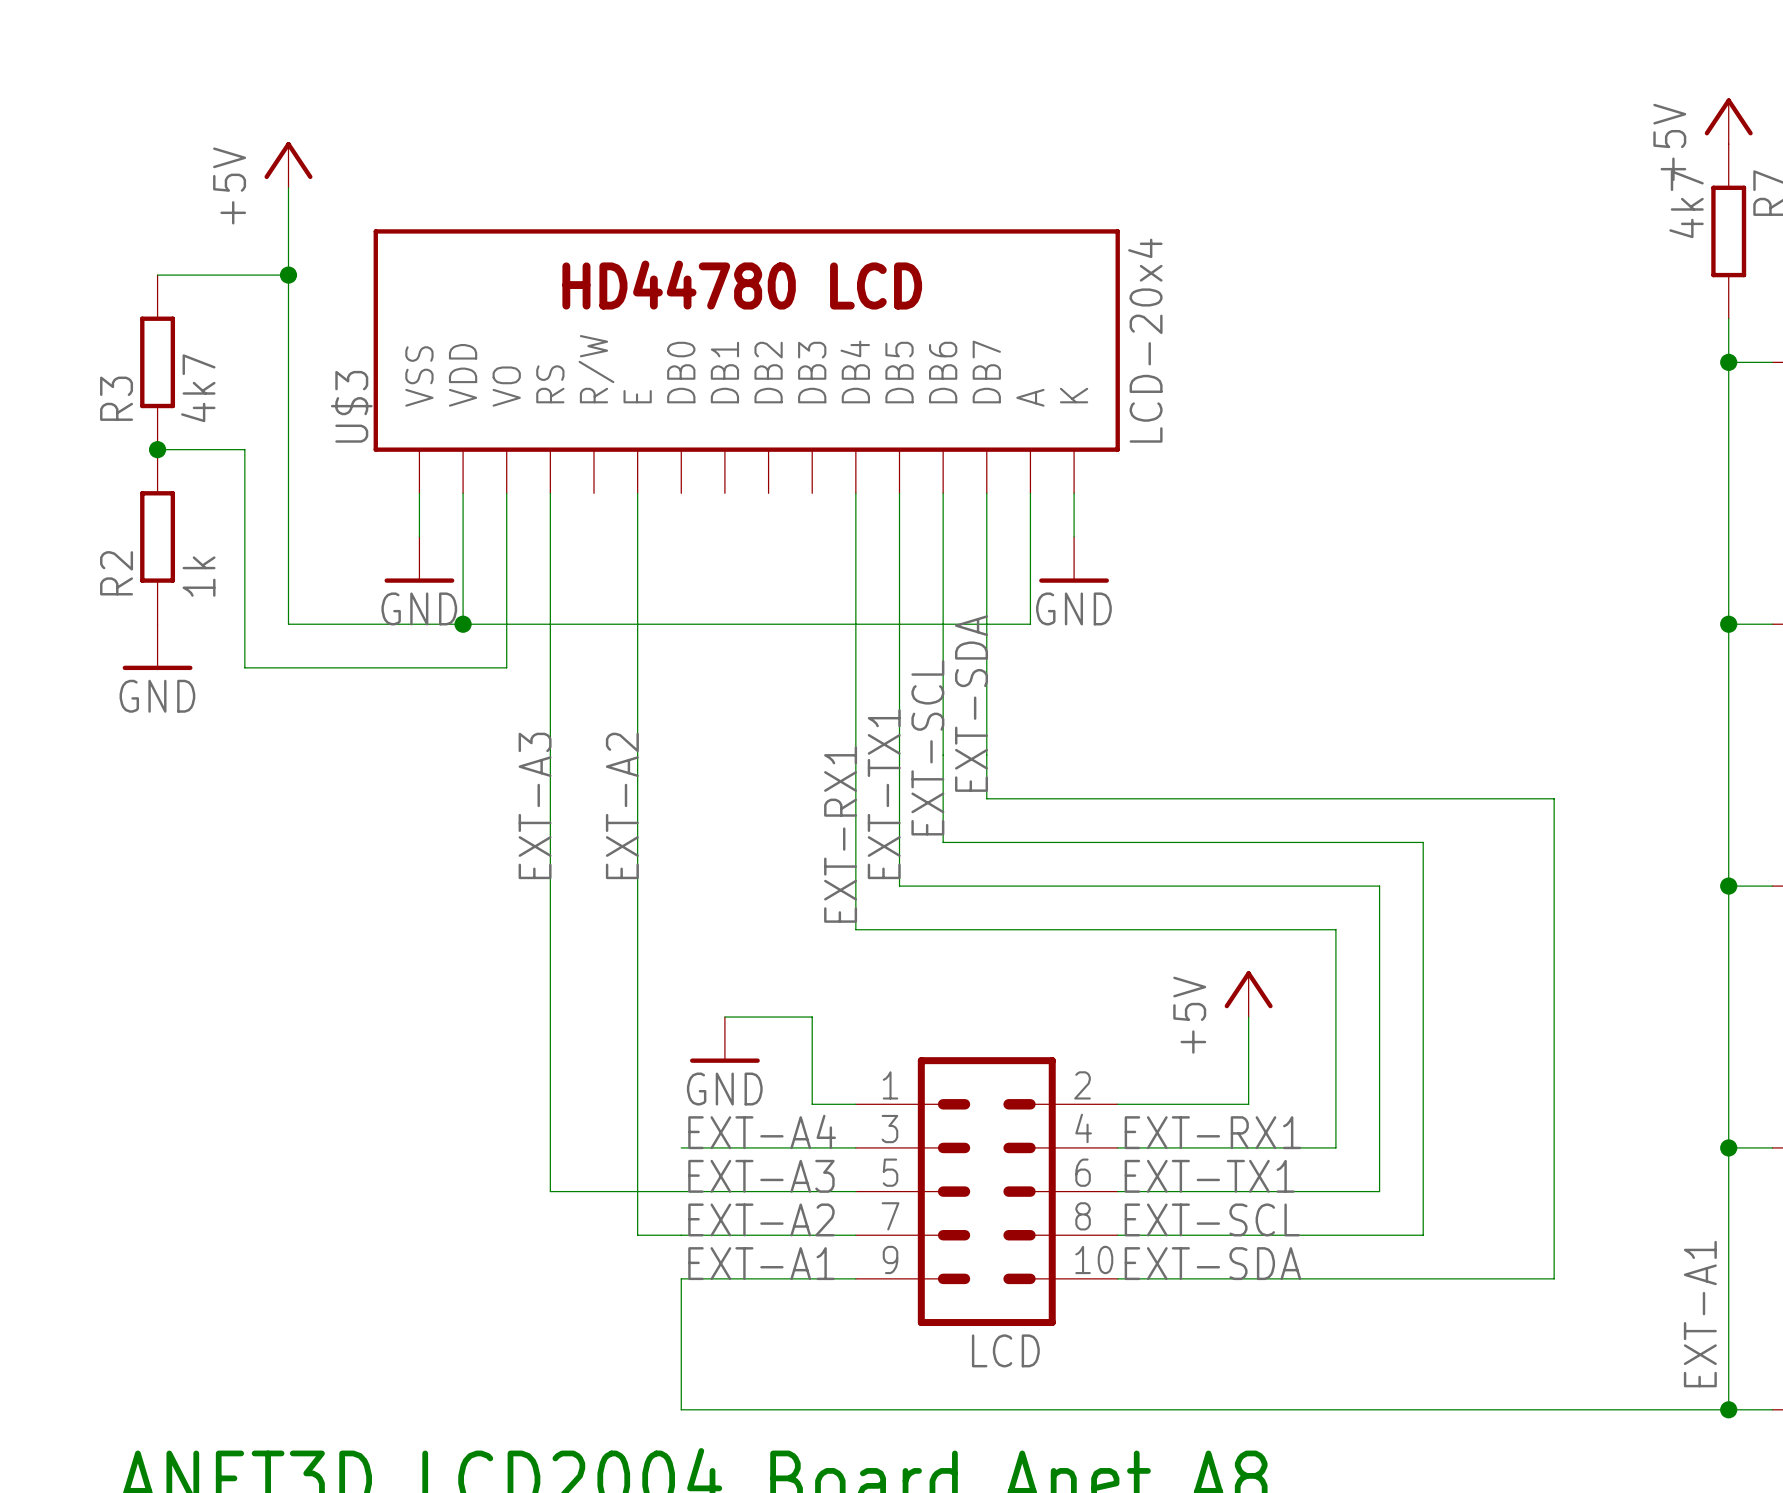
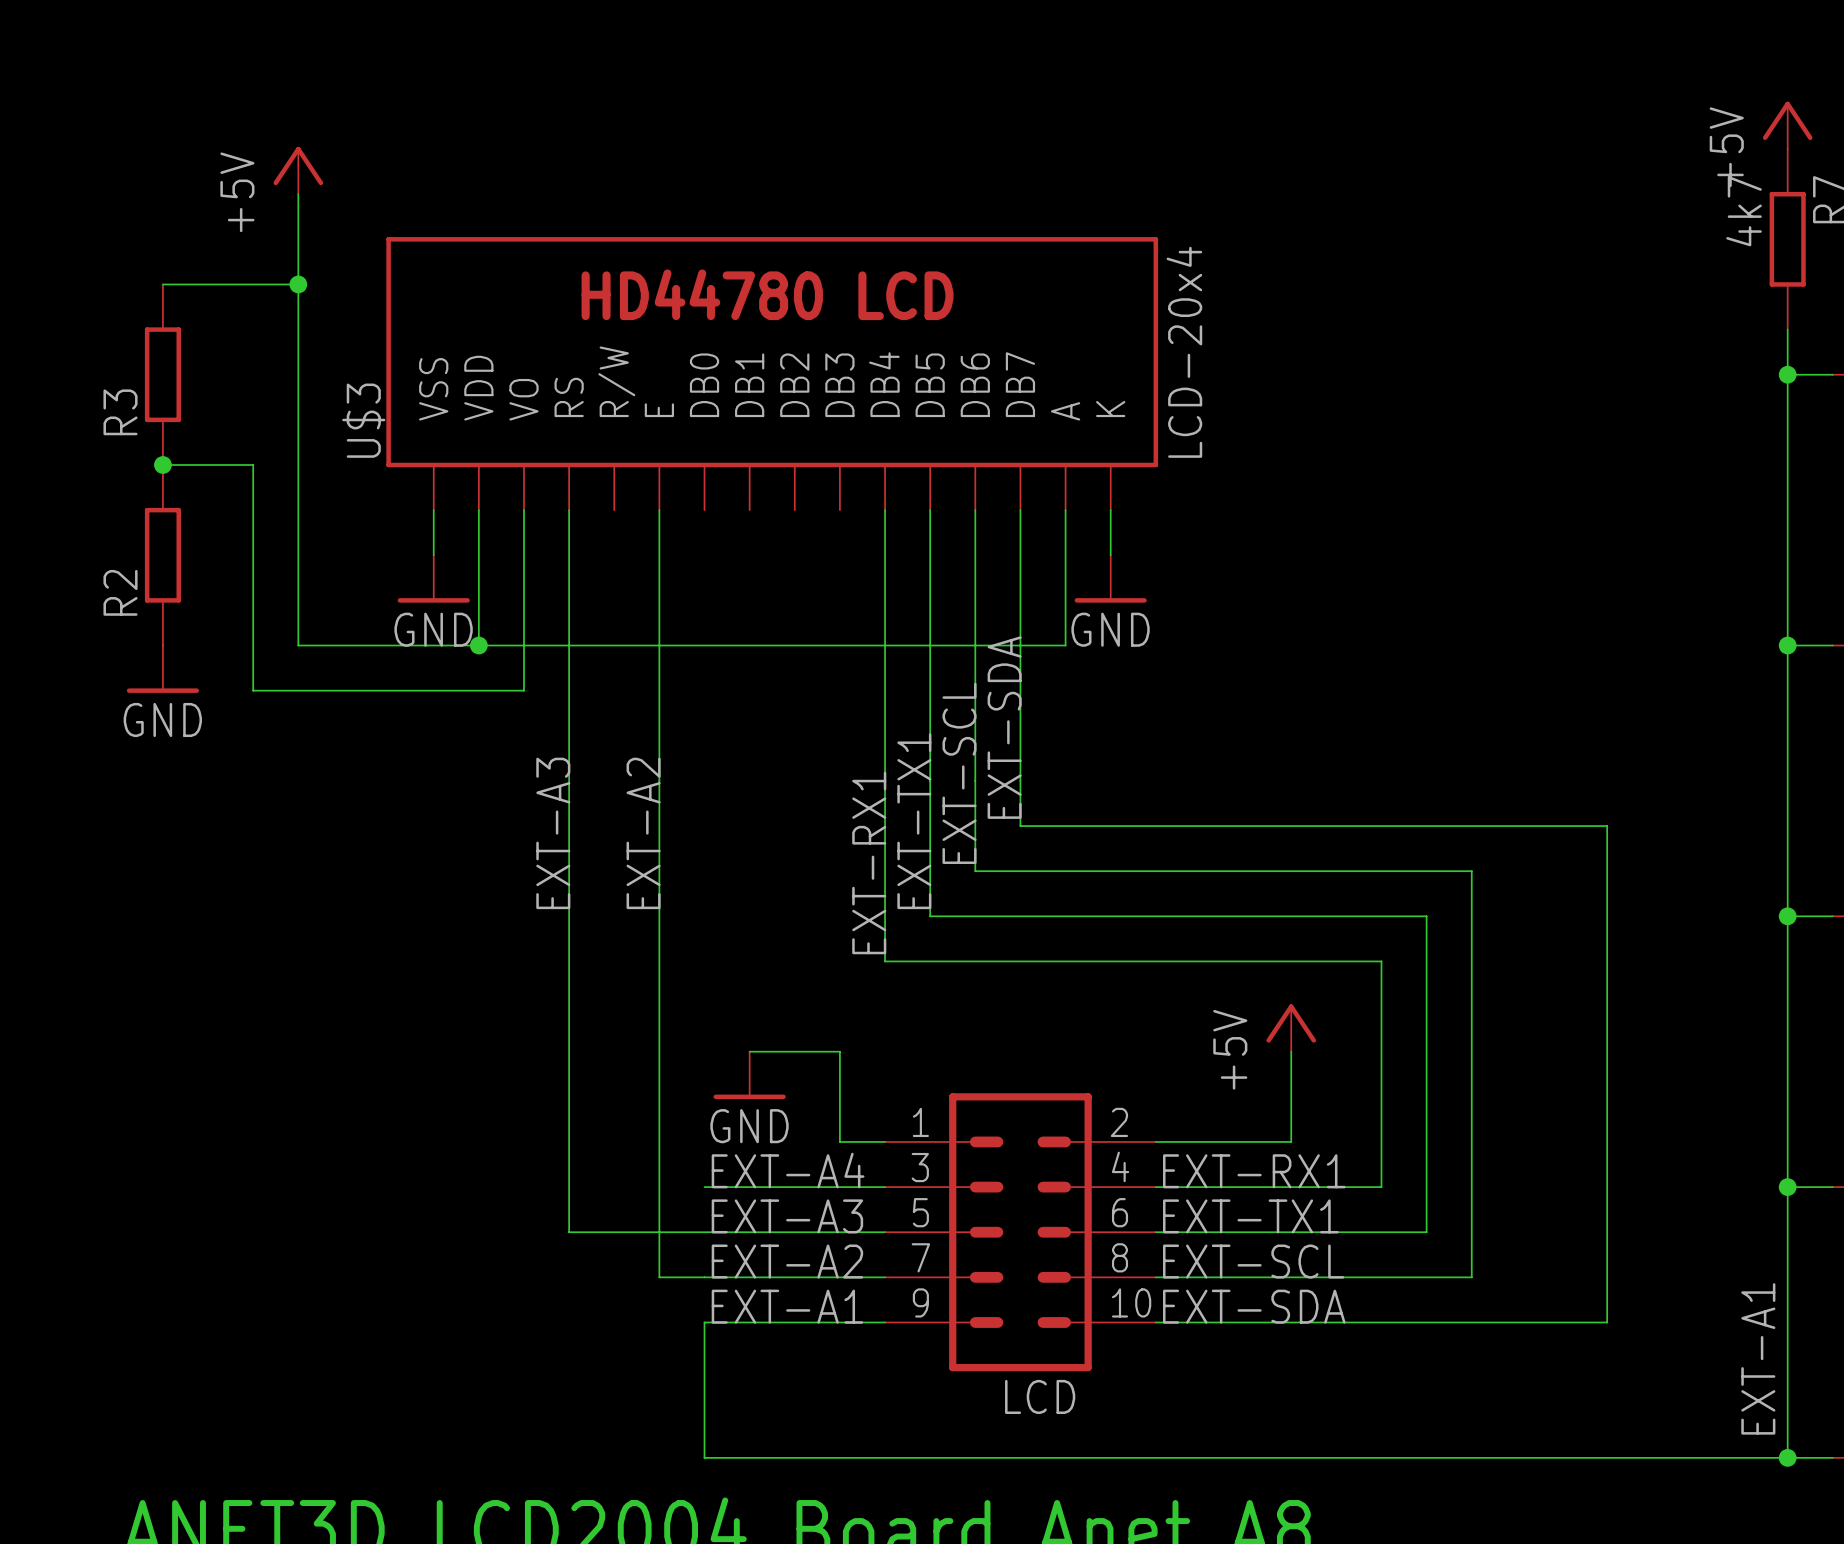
R3 value: 4k7 (198, 388) -> none
R2 value: 1k (199, 576) -> none

